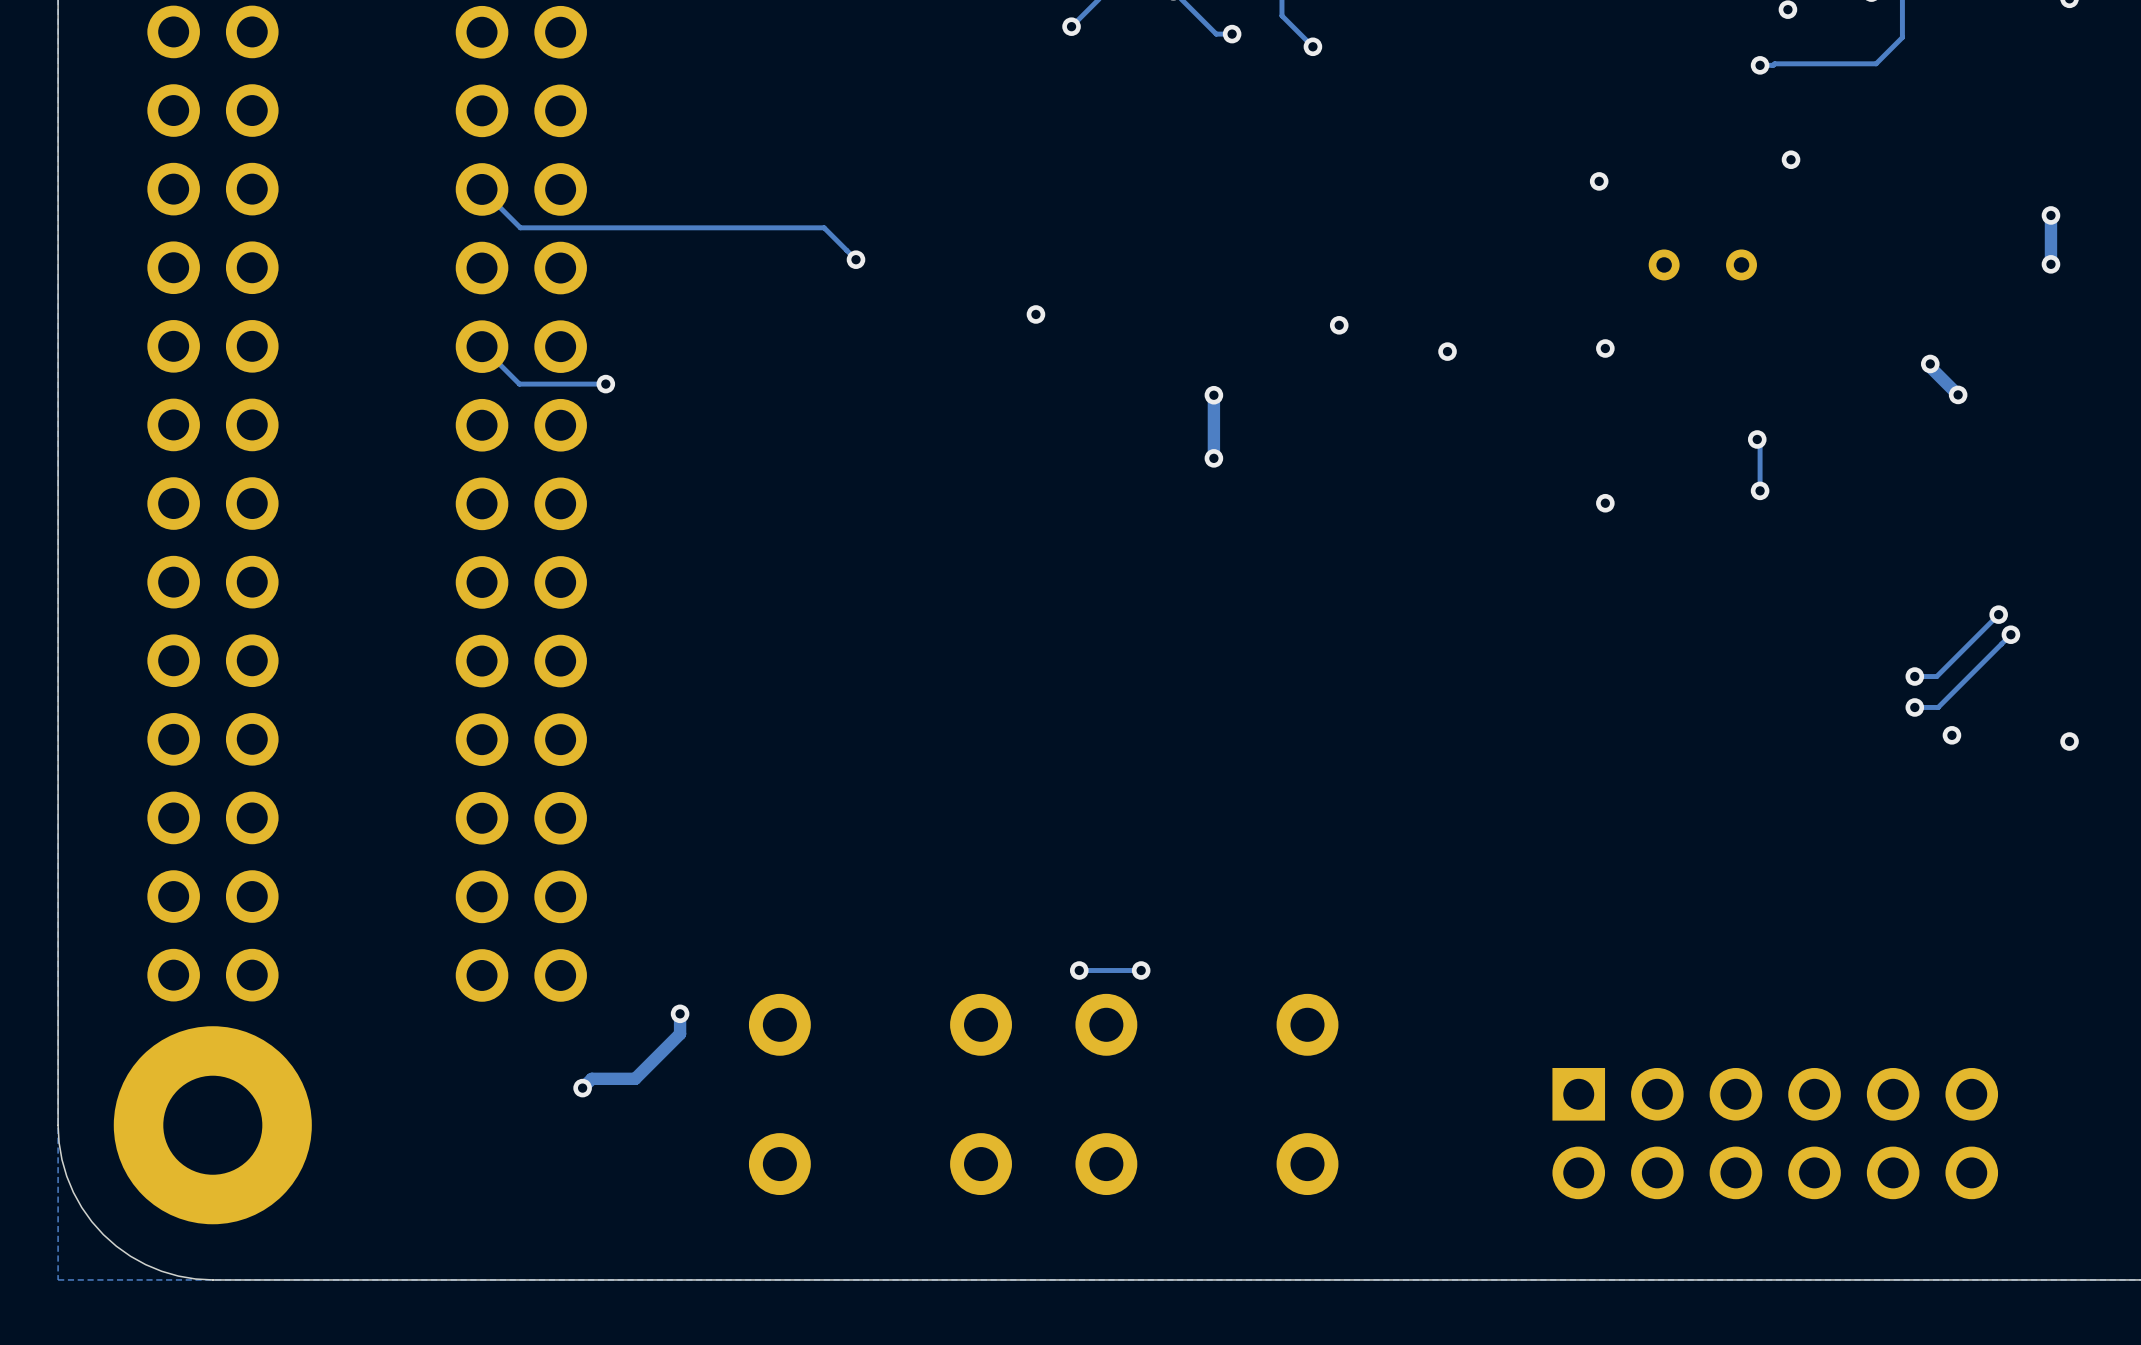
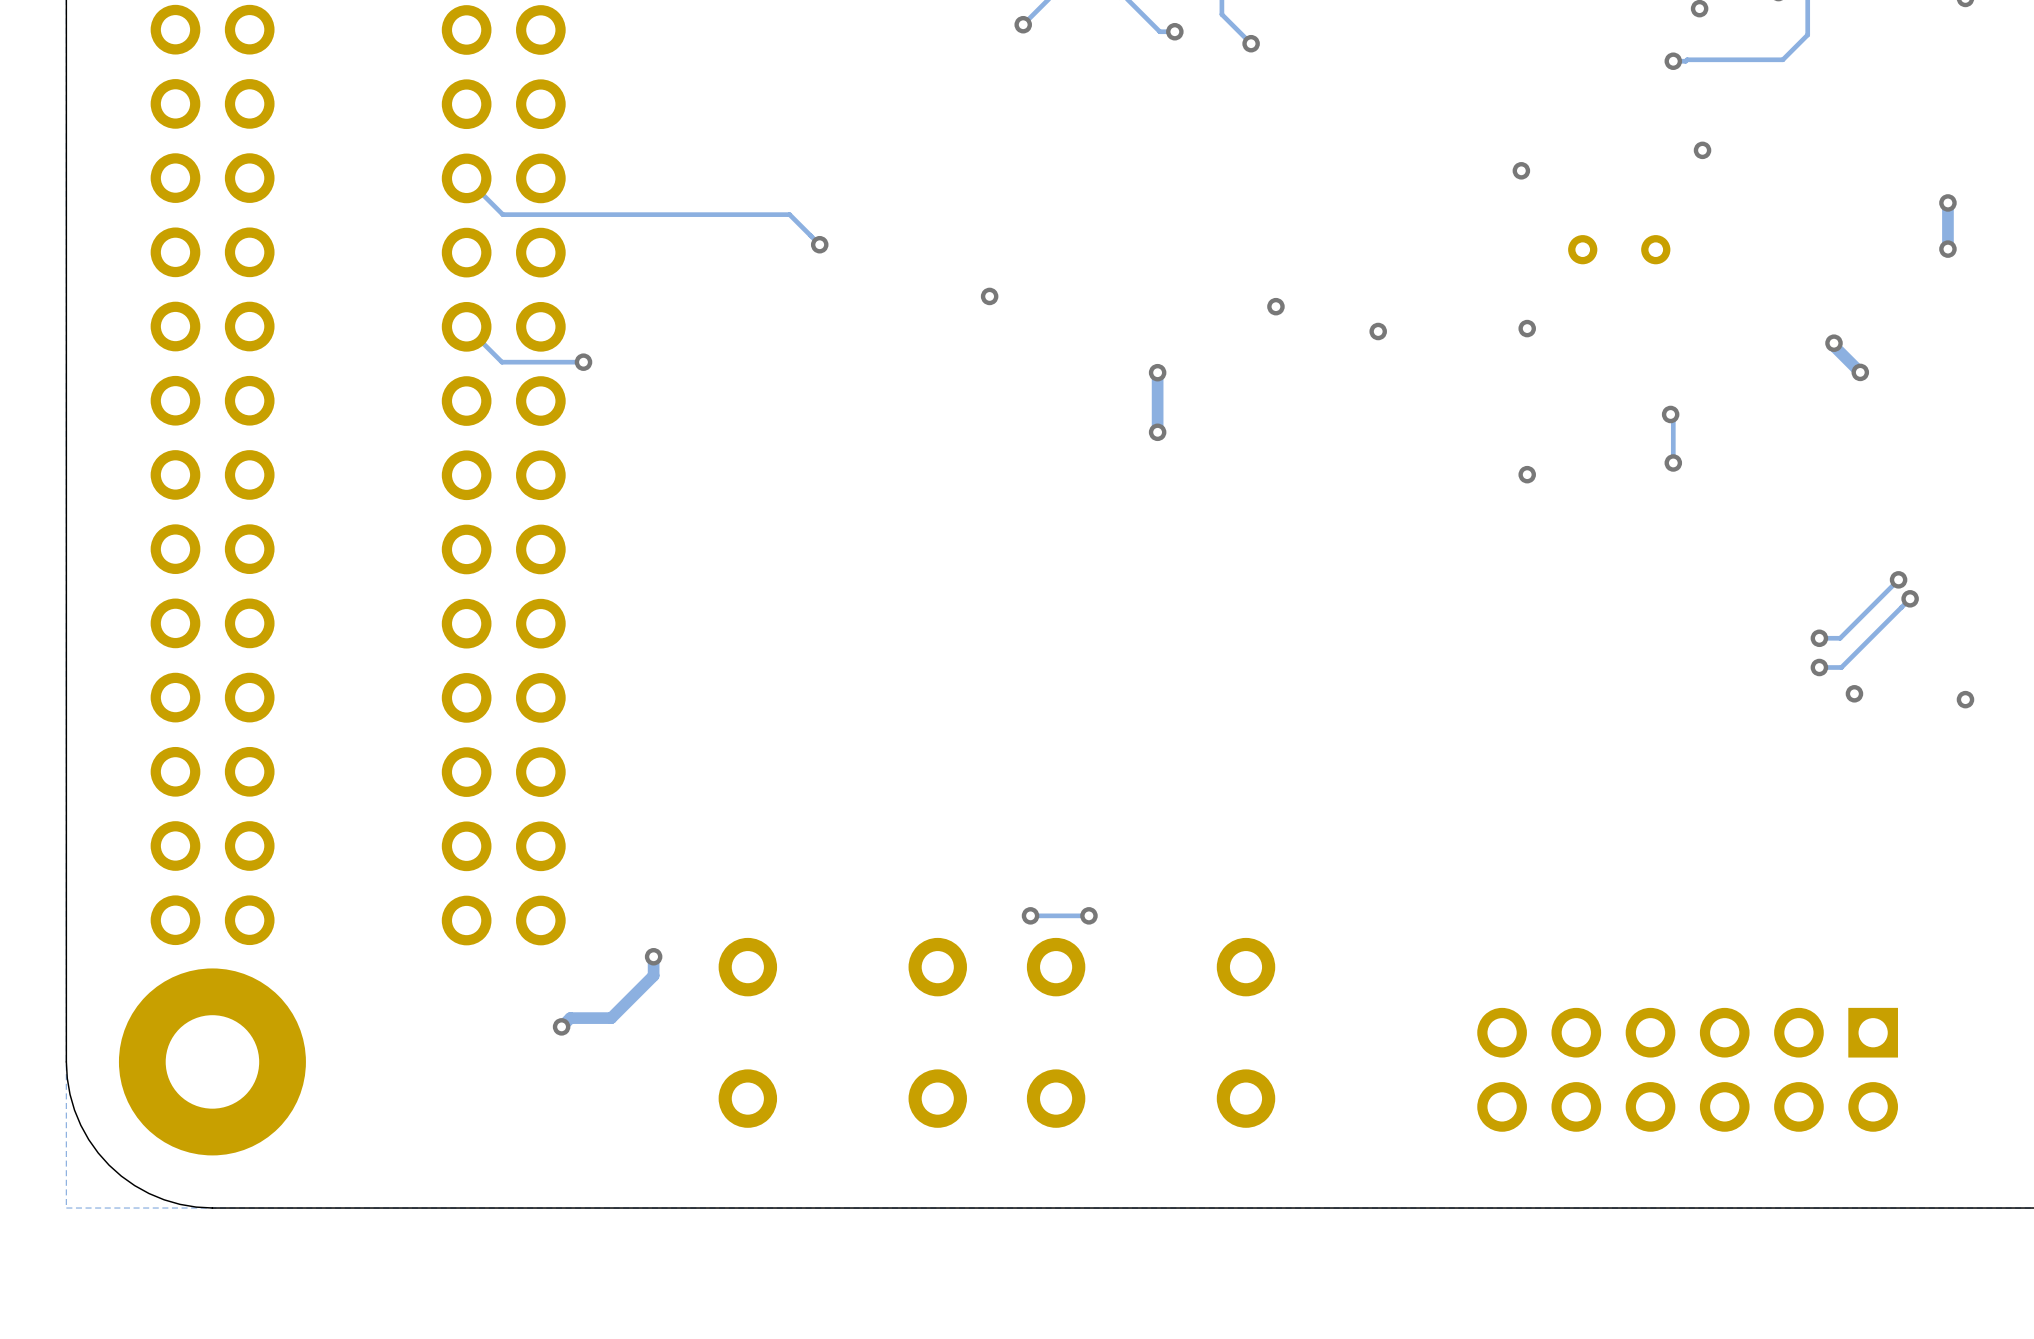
part footprint: [1552, 1067, 1999, 1200] -> [1477, 1007, 1898, 1132]

